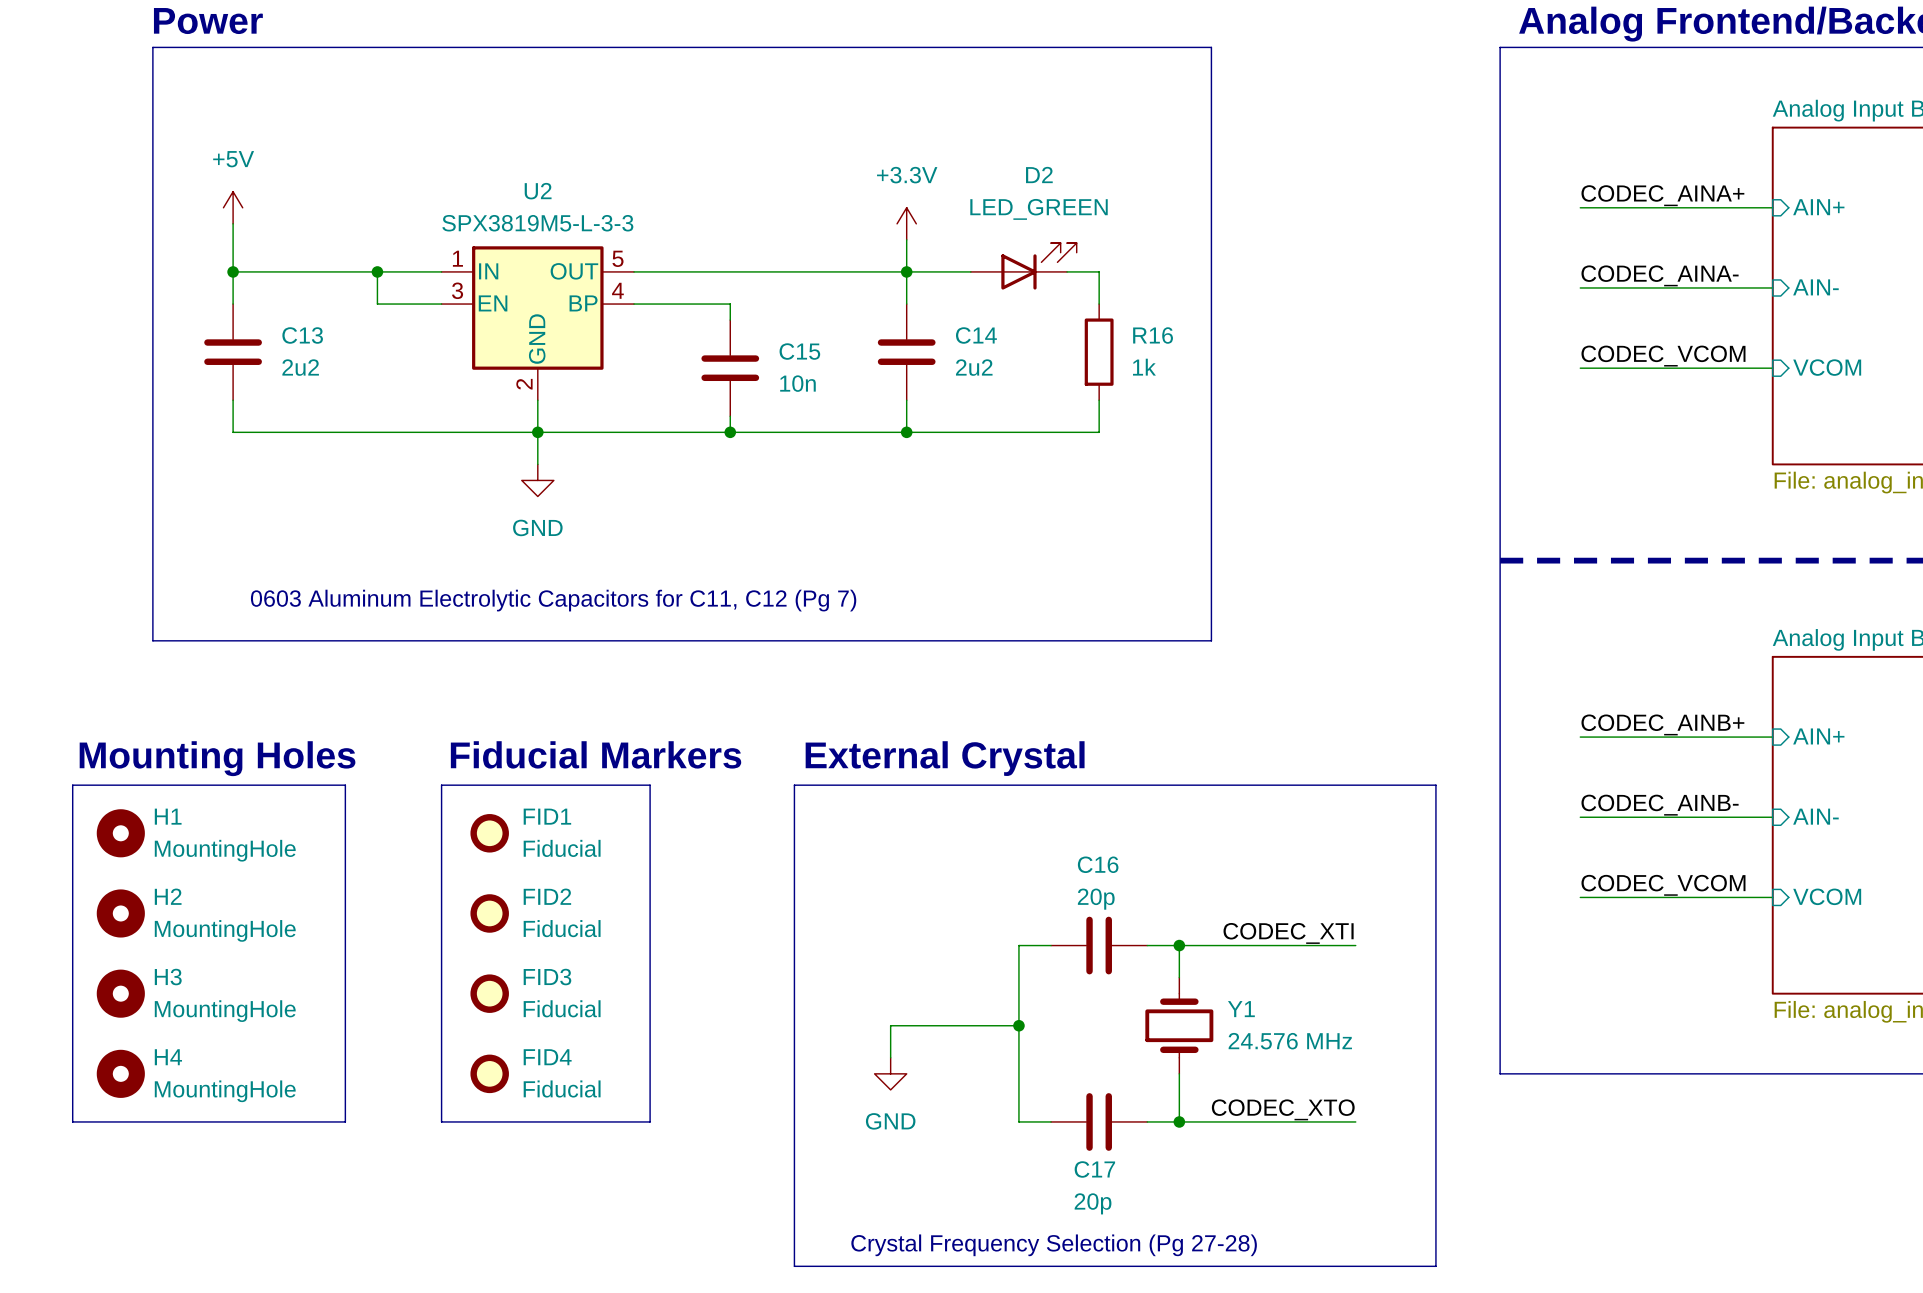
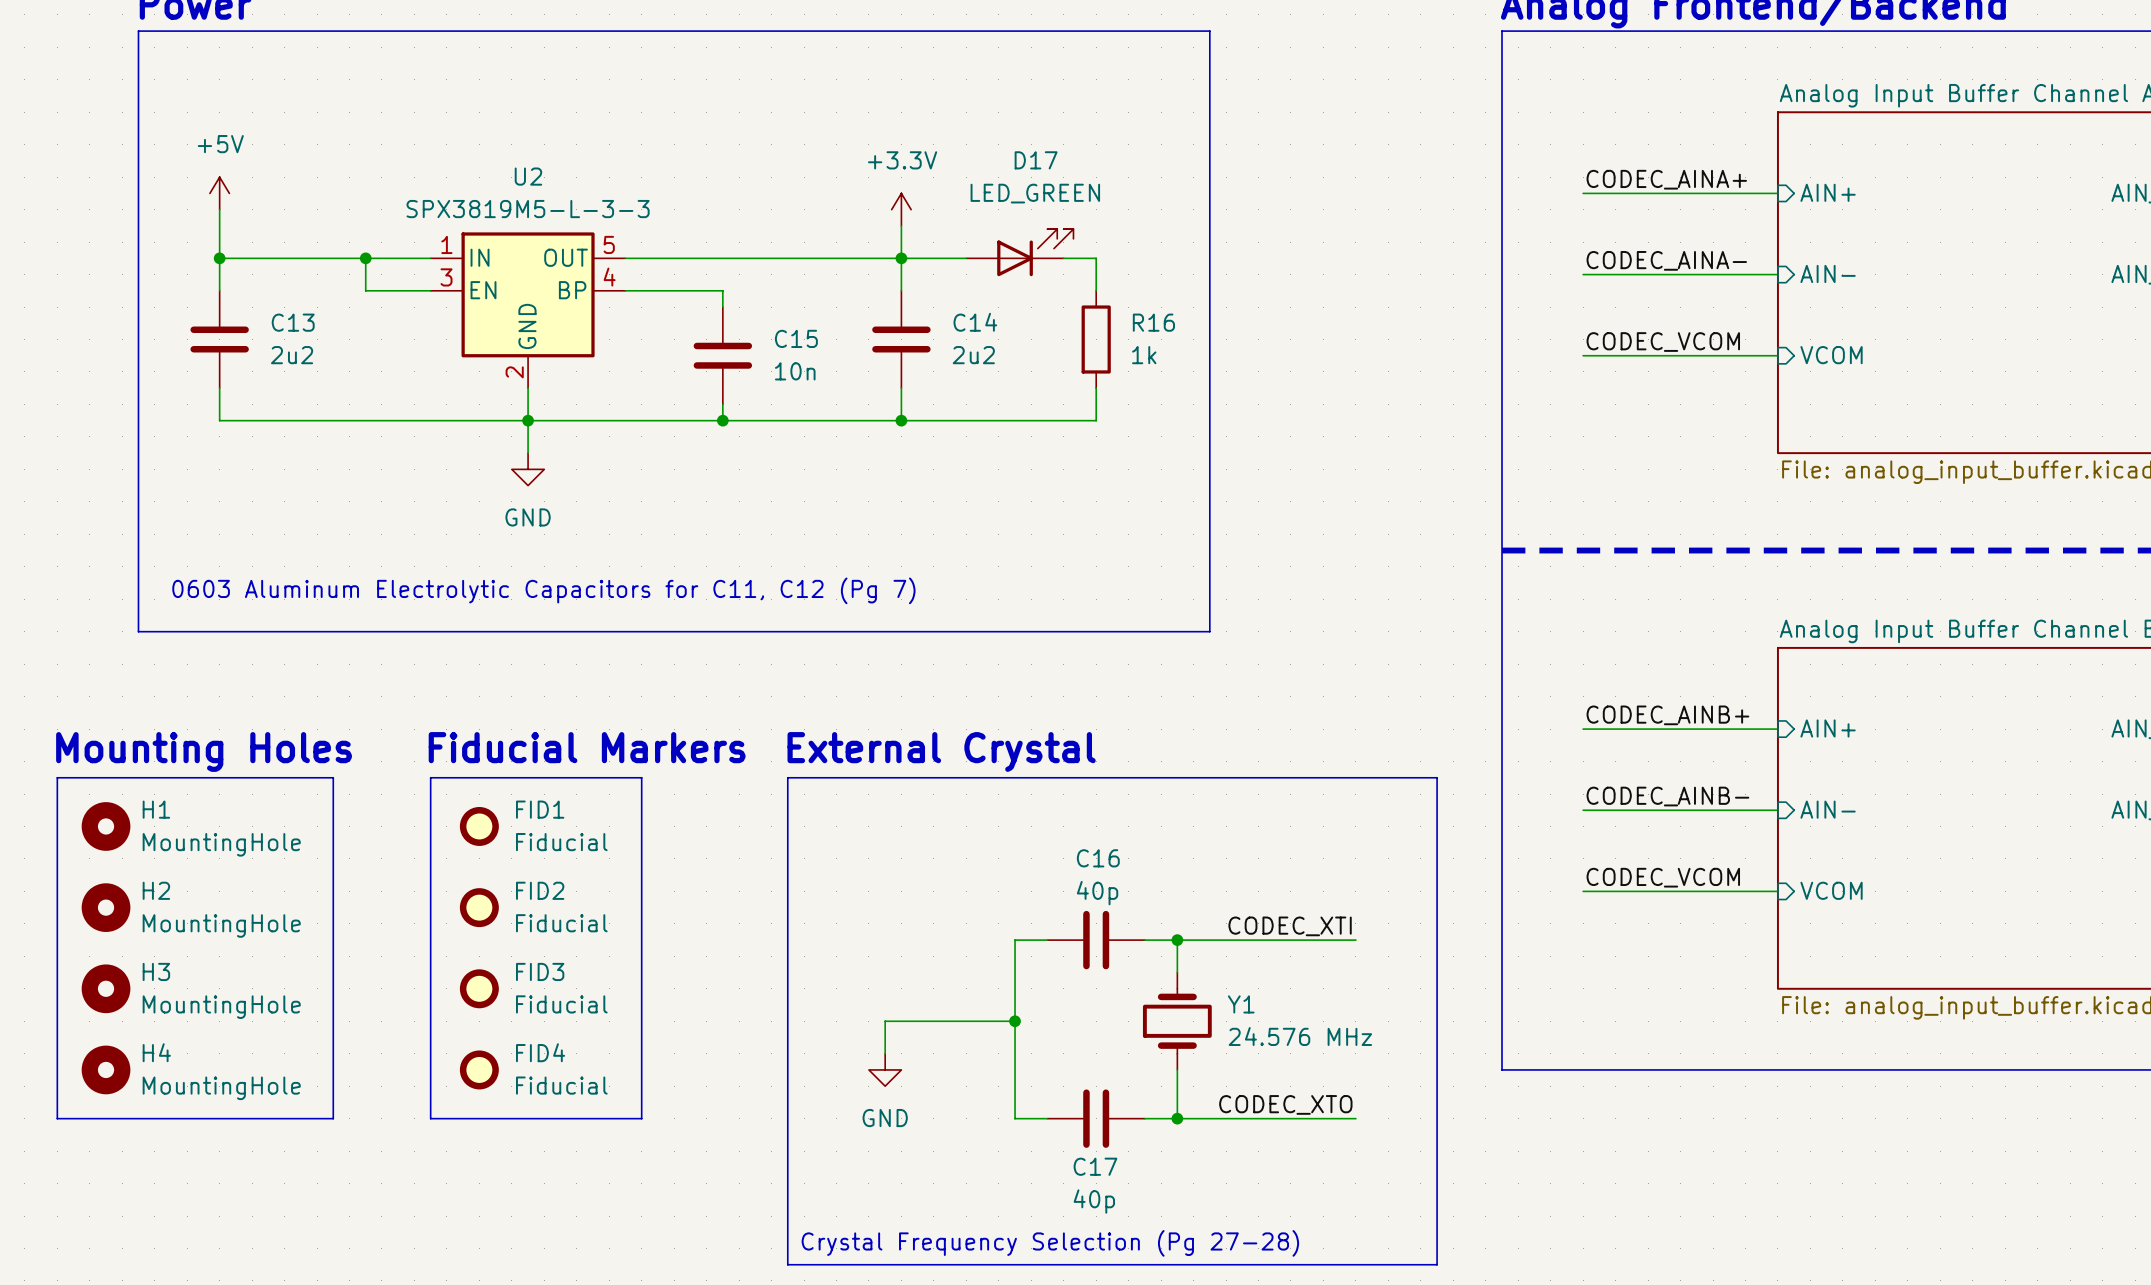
D2 name: D2 (1039, 175) -> D17 (1036, 160)
C16 value: 20p (1096, 899) -> 40p (1097, 893)
C17 value: 20p (1093, 1203) -> 40p (1094, 1201)

